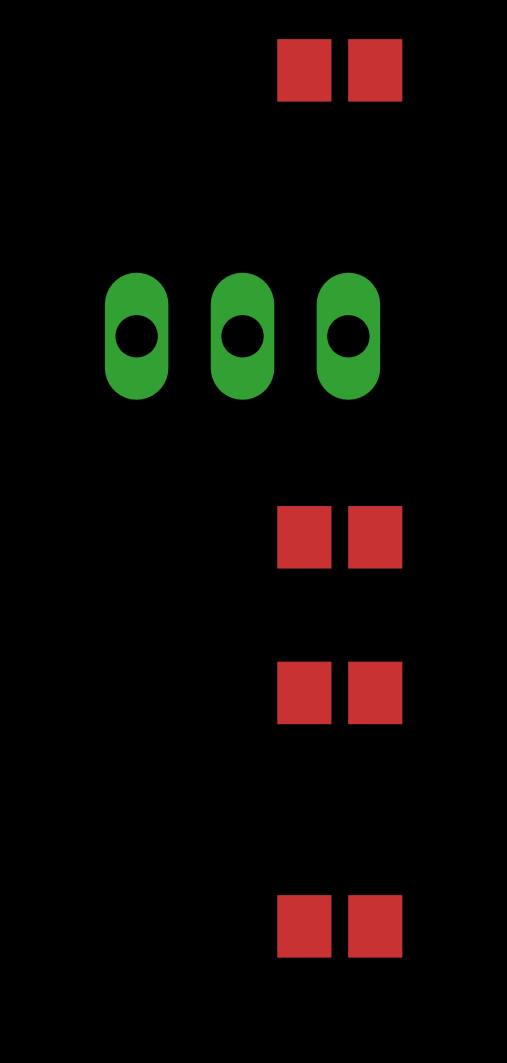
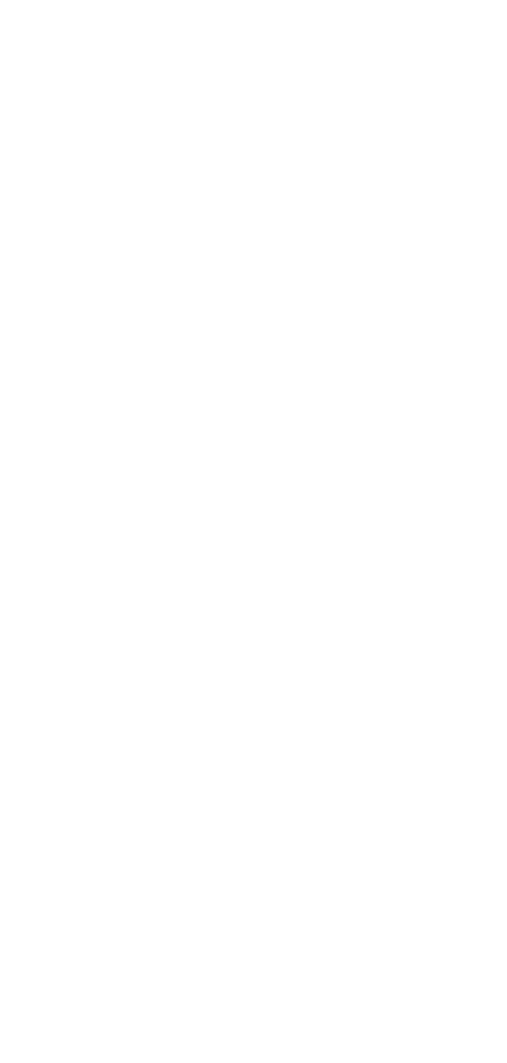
part: (339, 70) -> none
part: (242, 336) -> none
part: (339, 537) -> none
part: (339, 692) -> none
part: (339, 926) -> none

